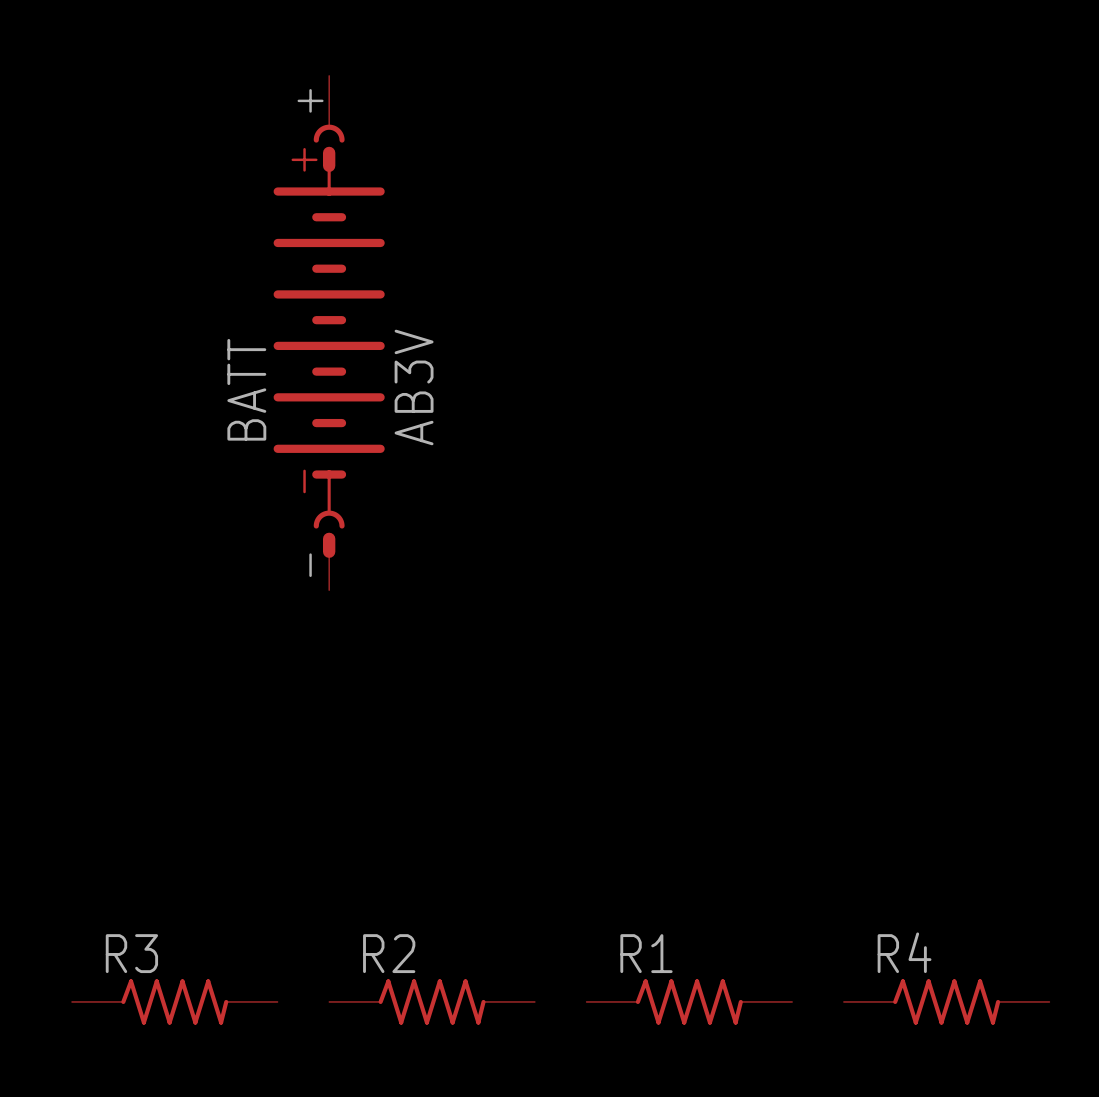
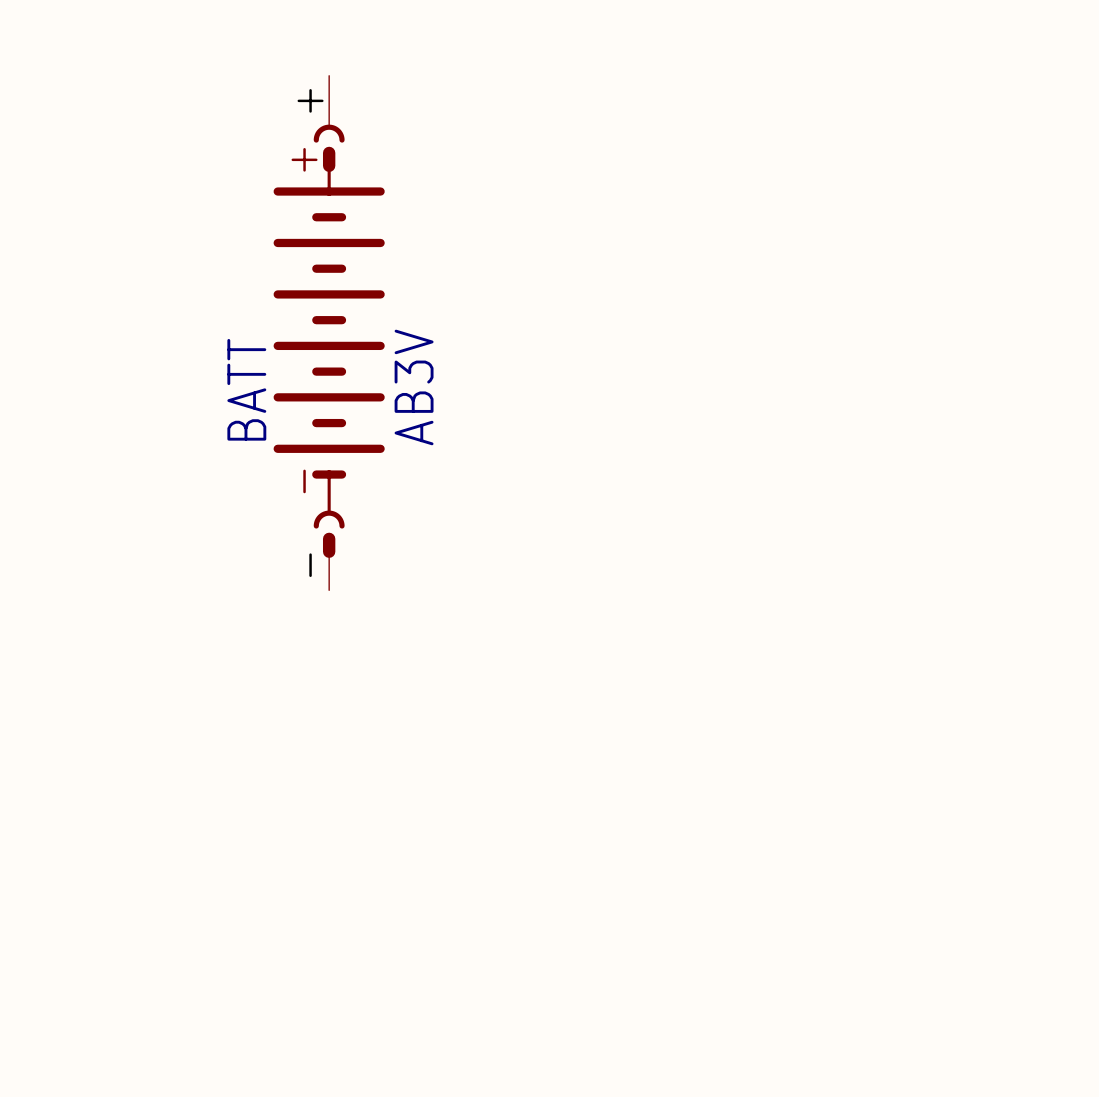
R3: (174, 1001) -> none
R2: (432, 1001) -> none
R1: (689, 1001) -> none
R4: (946, 1001) -> none

